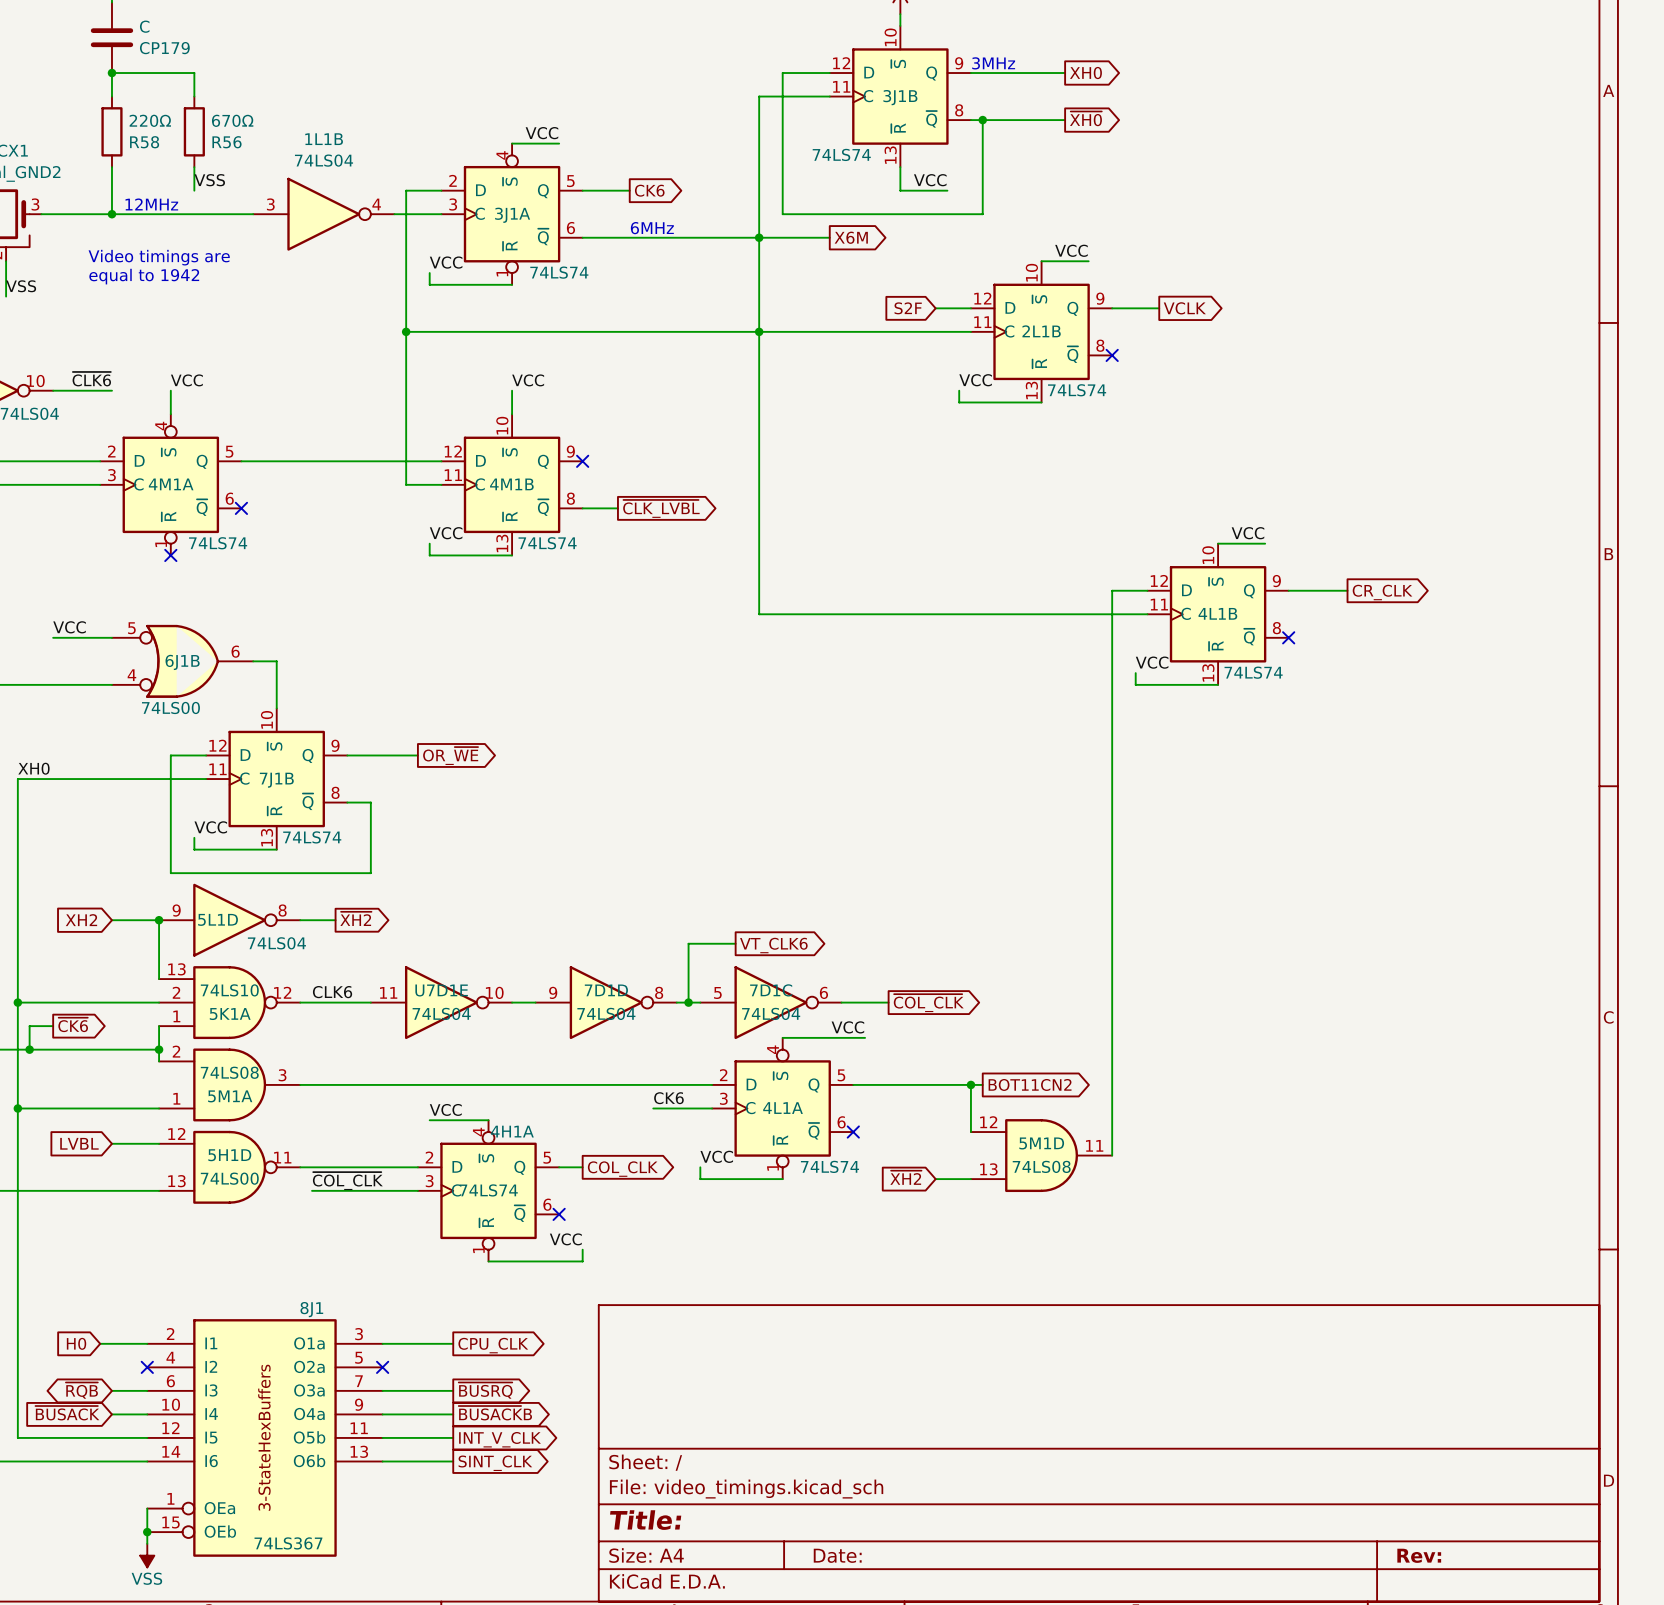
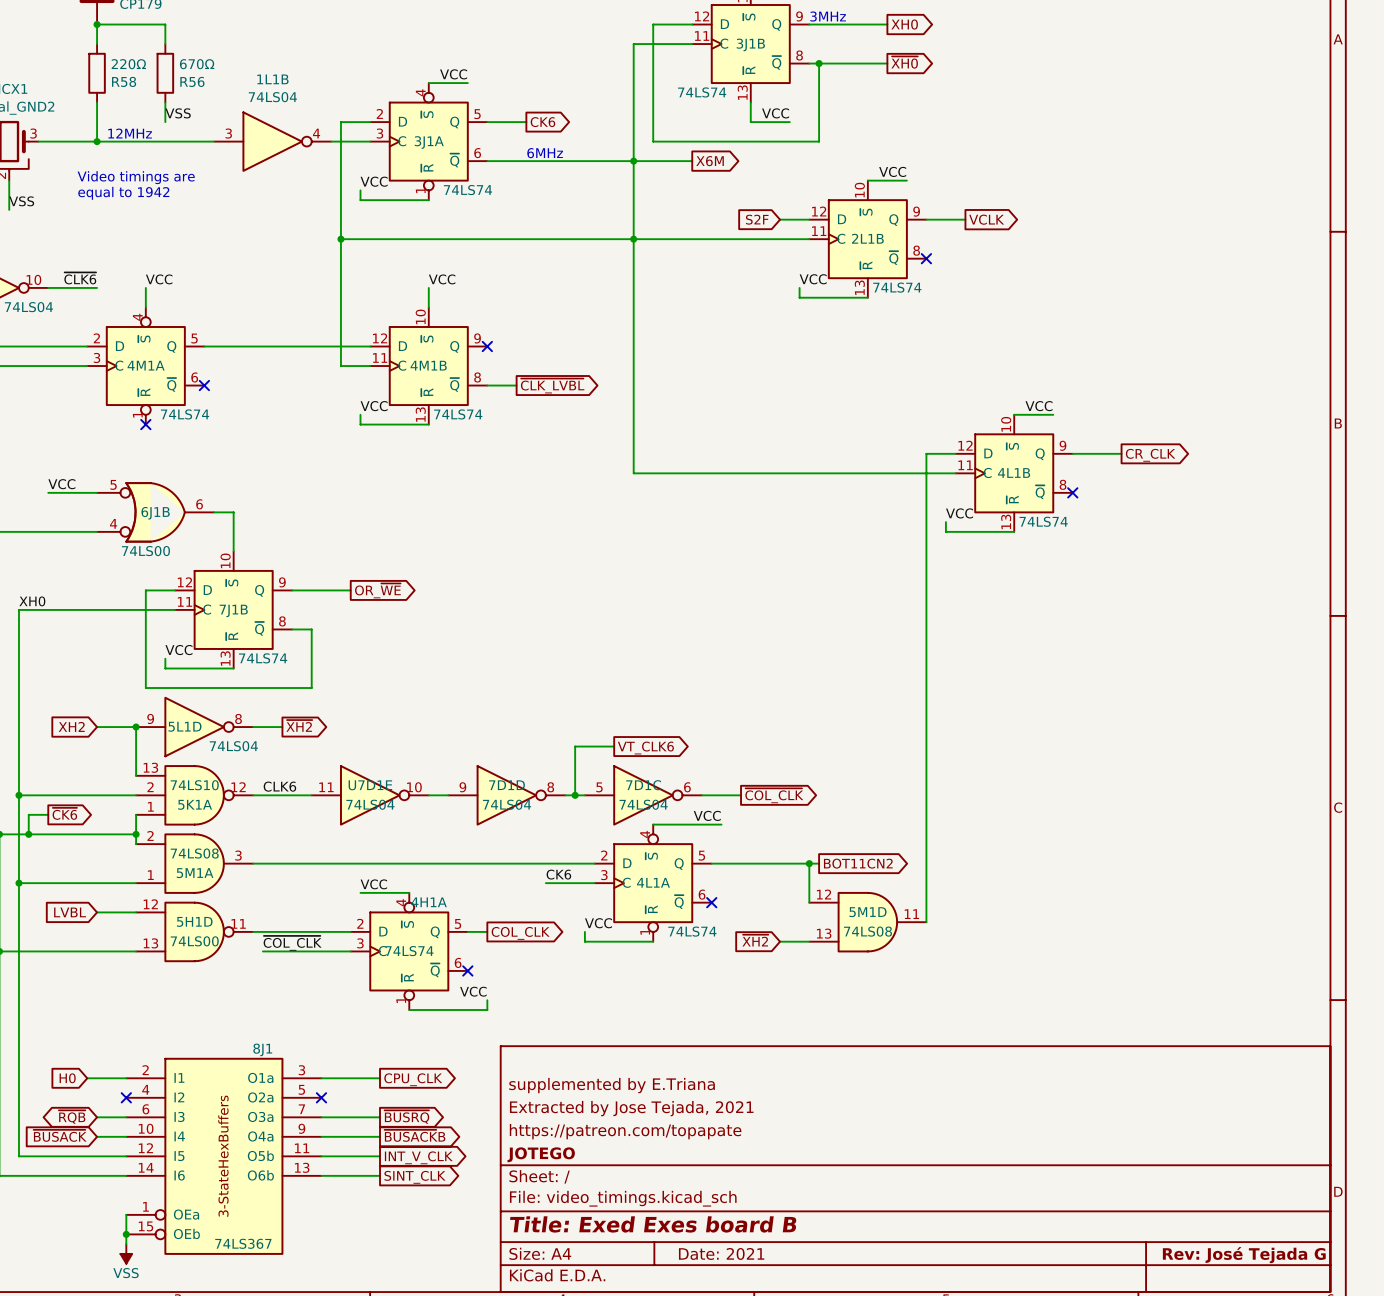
title block: none -> supplemented by E.Triana (612, 1085)
title block: none -> Extracted by Jose Tejada, 2021 (631, 1108)
title block: none -> https://patreon.com/topapate (625, 1131)
title block: none -> JOTEGO (541, 1154)
title block: Title: (645, 1520) -> Title: Exed Exes board B (653, 1224)
title block: Date: (837, 1555) -> Date: 2021 (721, 1253)
title block: Rev: (1419, 1555) -> Rev: José Tejada G (1244, 1255)

